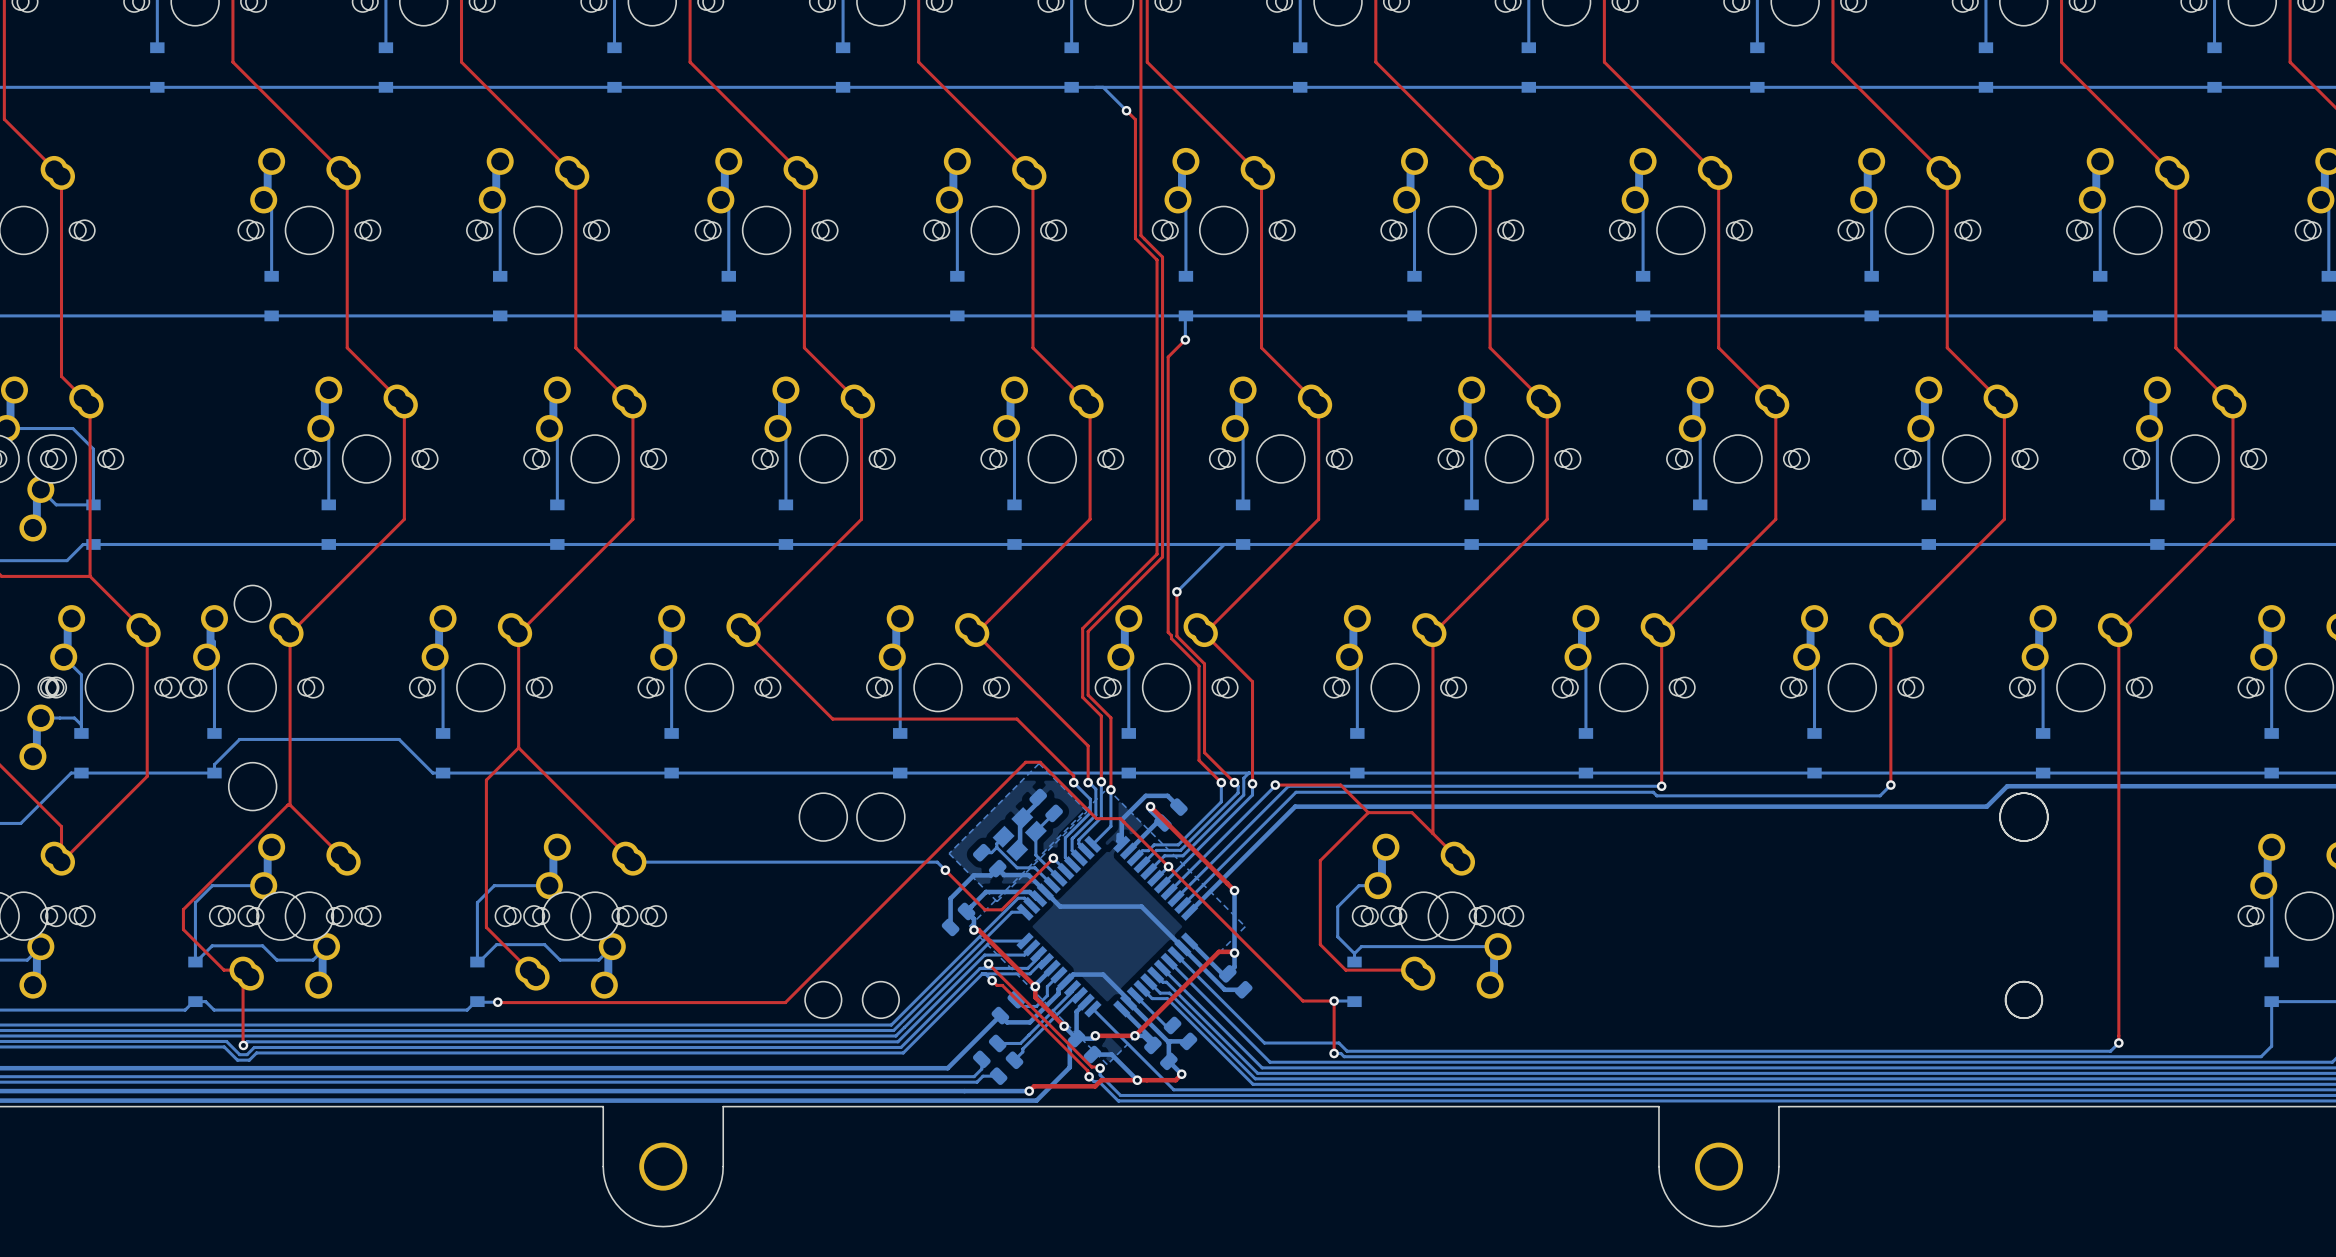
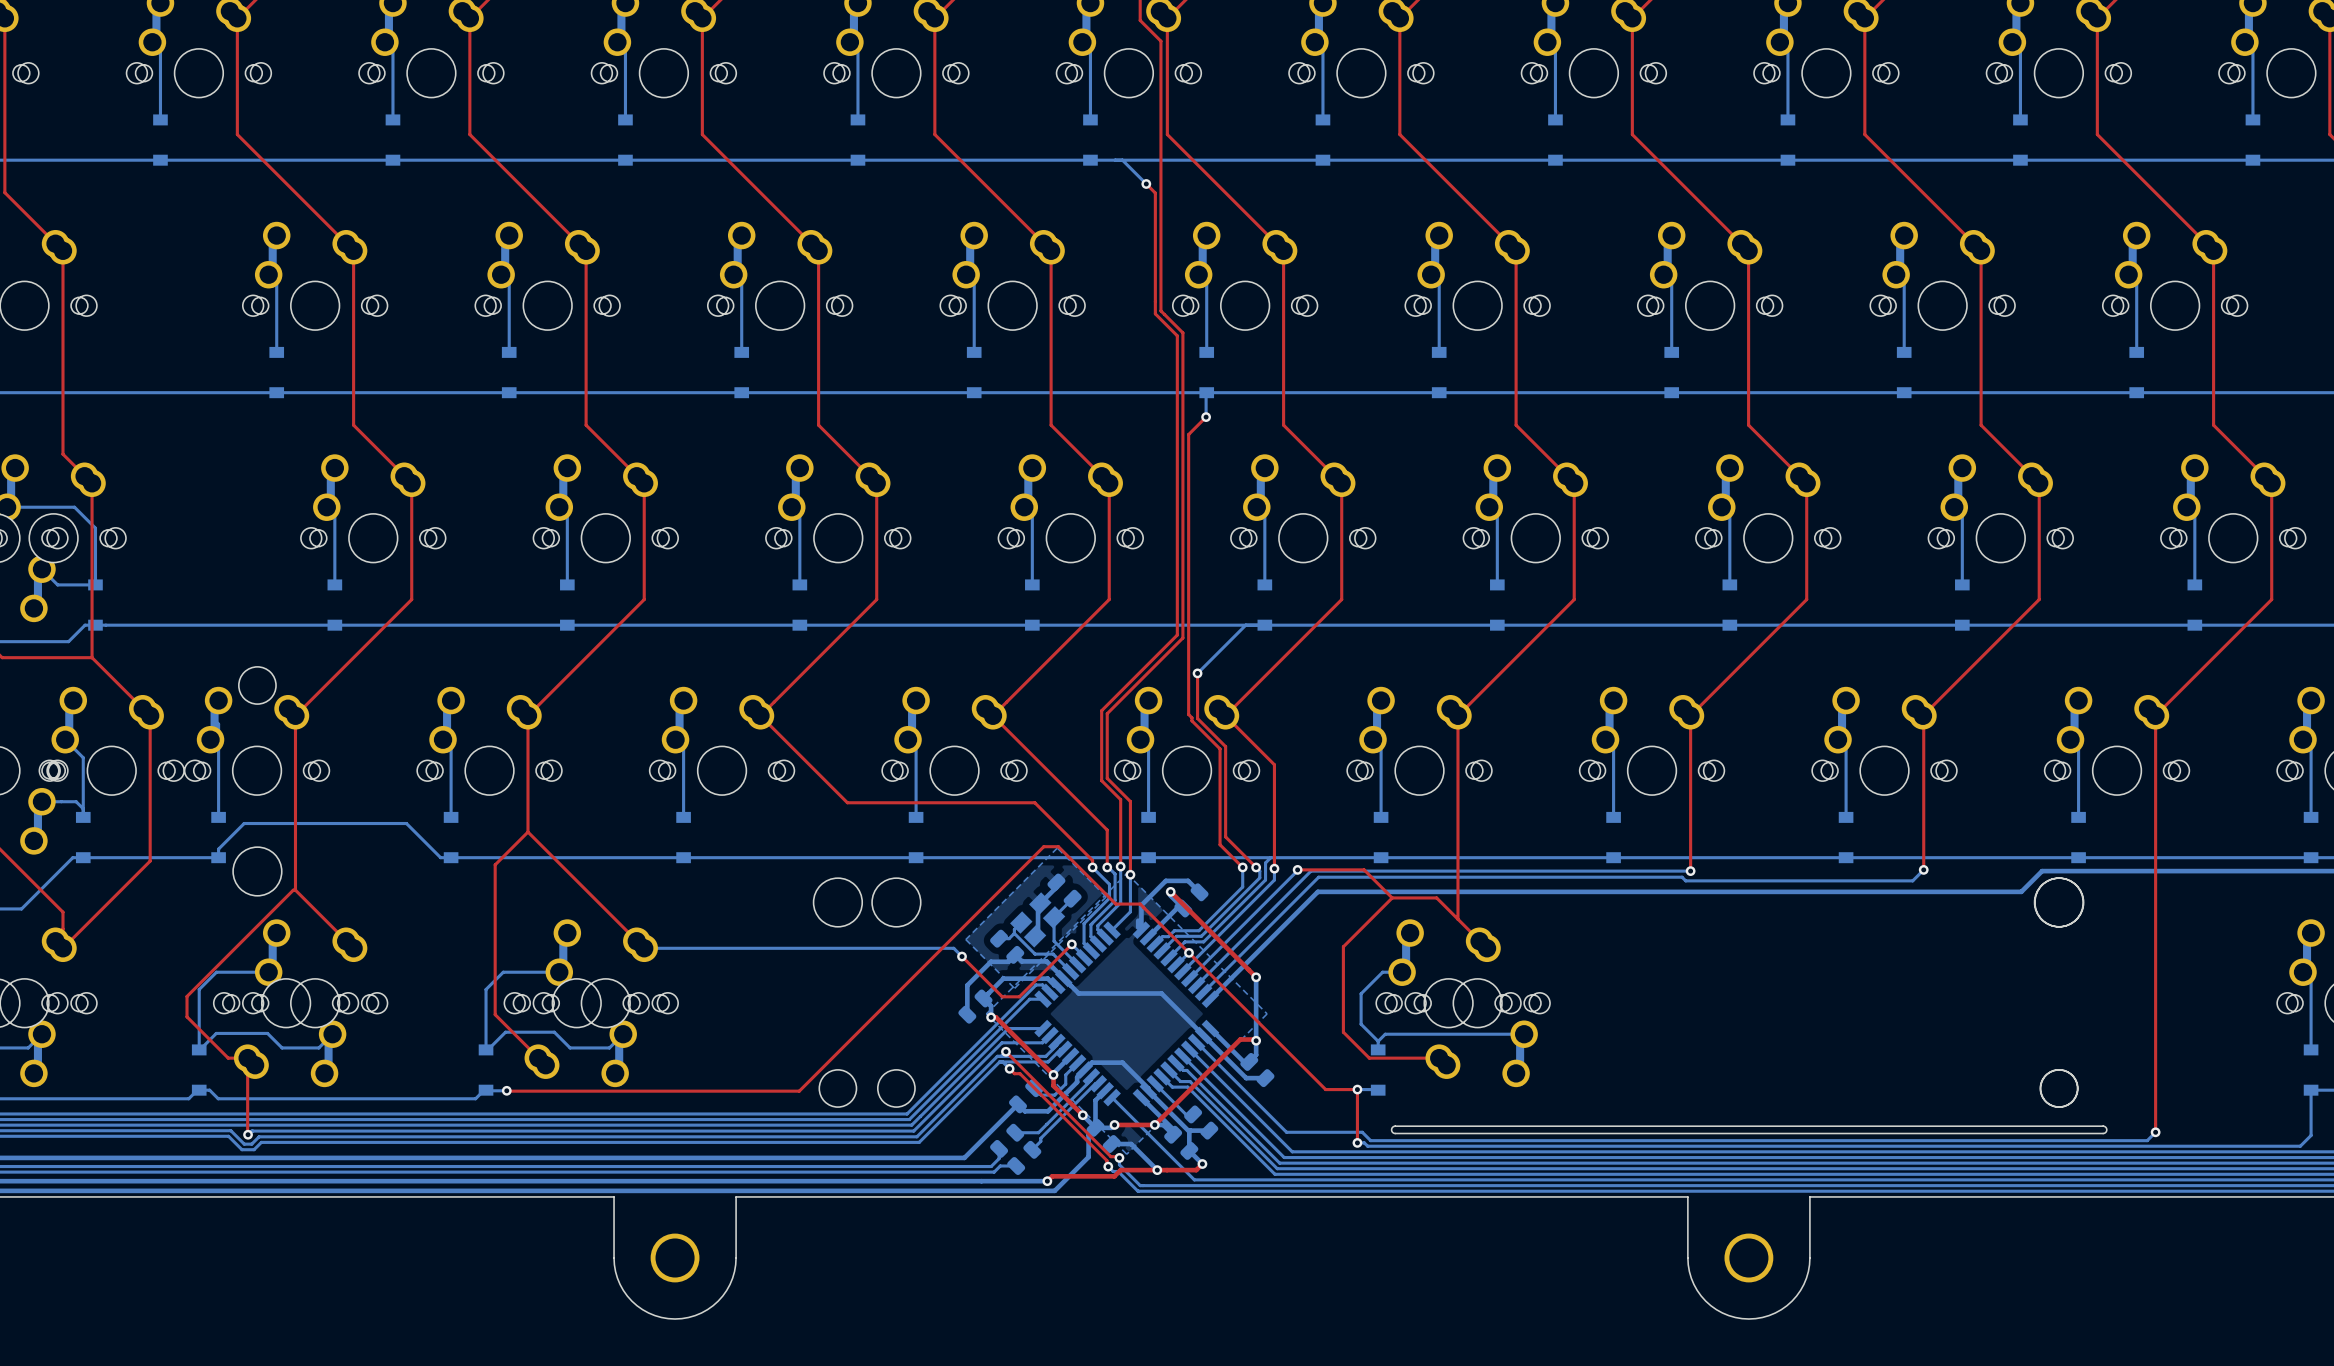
board edge: none -> (1395, 1126) (2103, 1126) (2106, 1129) (2103, 1133) (1395, 1133) (1391, 1129) (1395, 1126)

